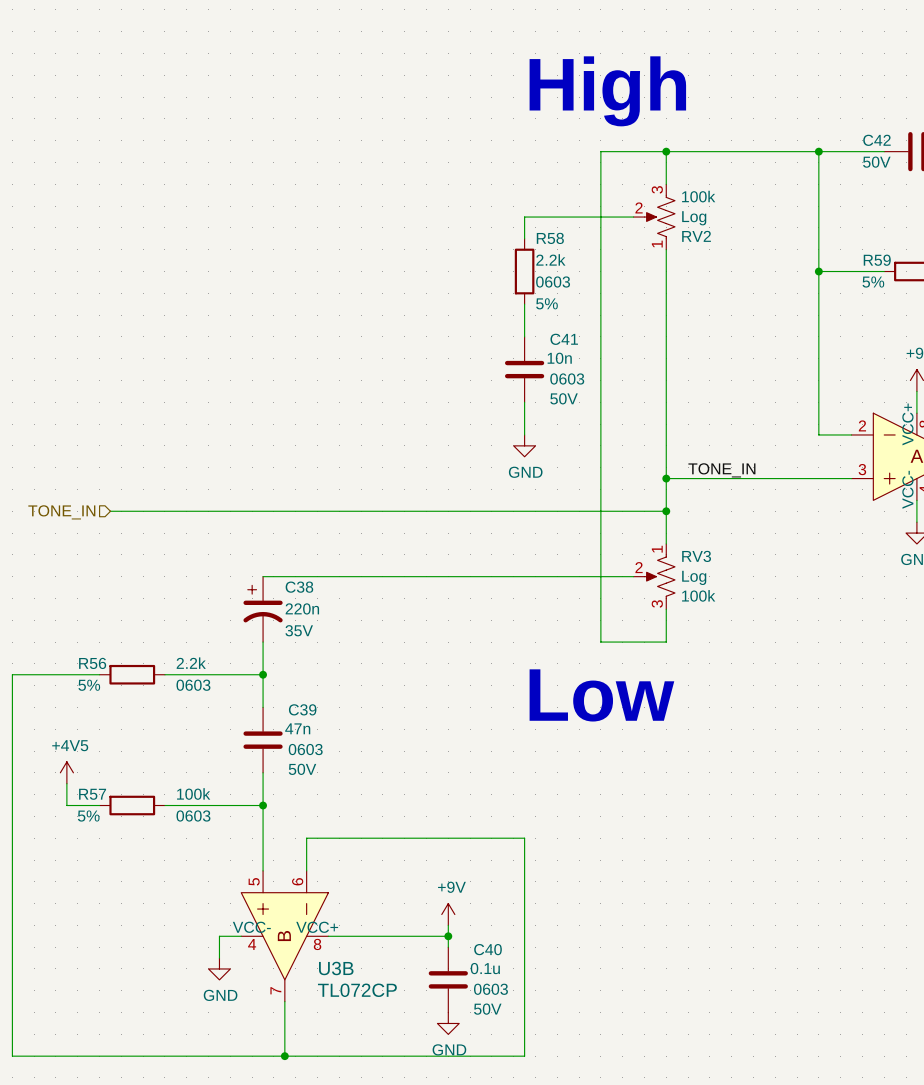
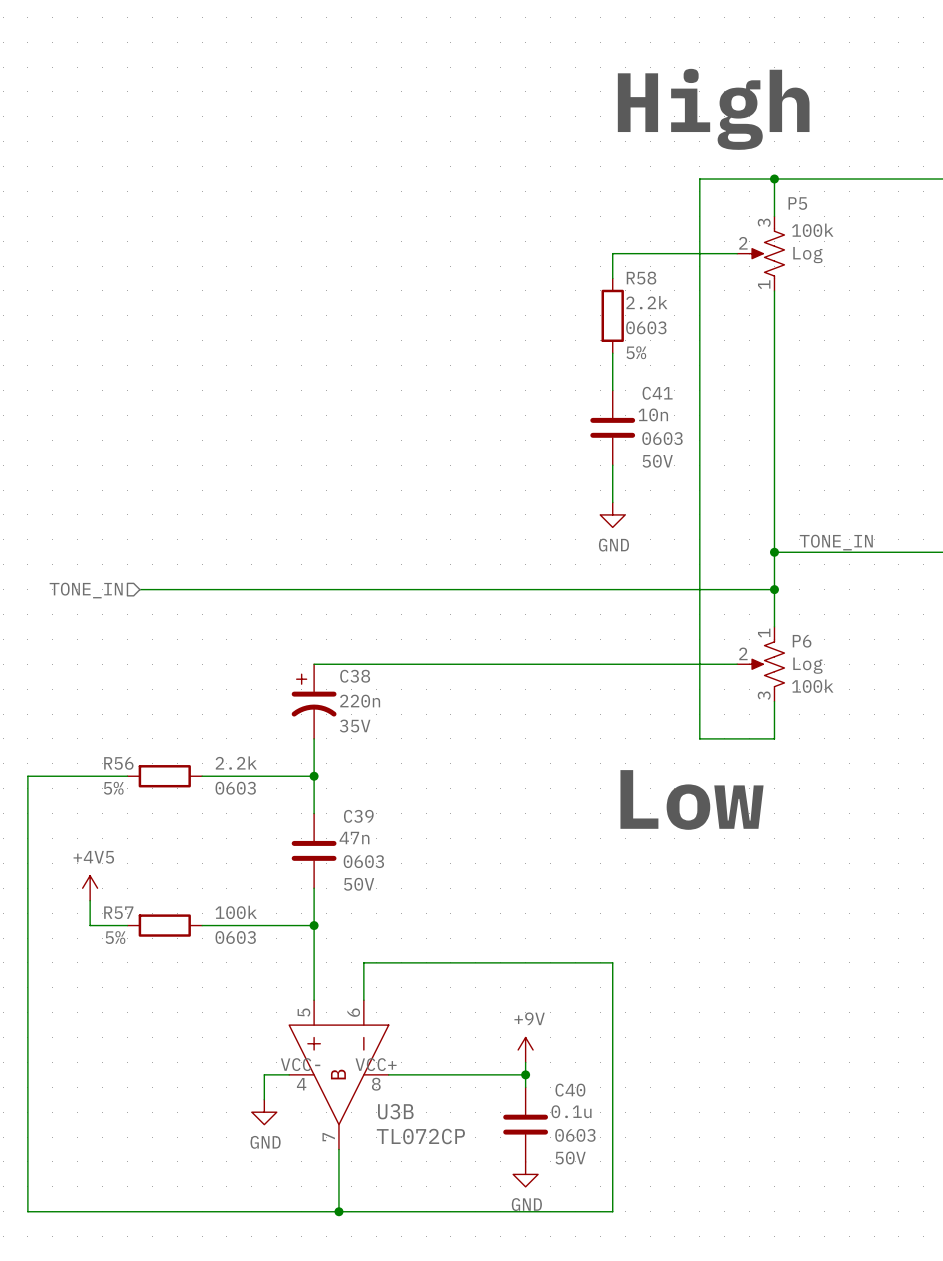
RV2 name: RV2 (696, 236) -> P5 (797, 203)
RV3 name: RV3 (696, 556) -> P6 (802, 641)

